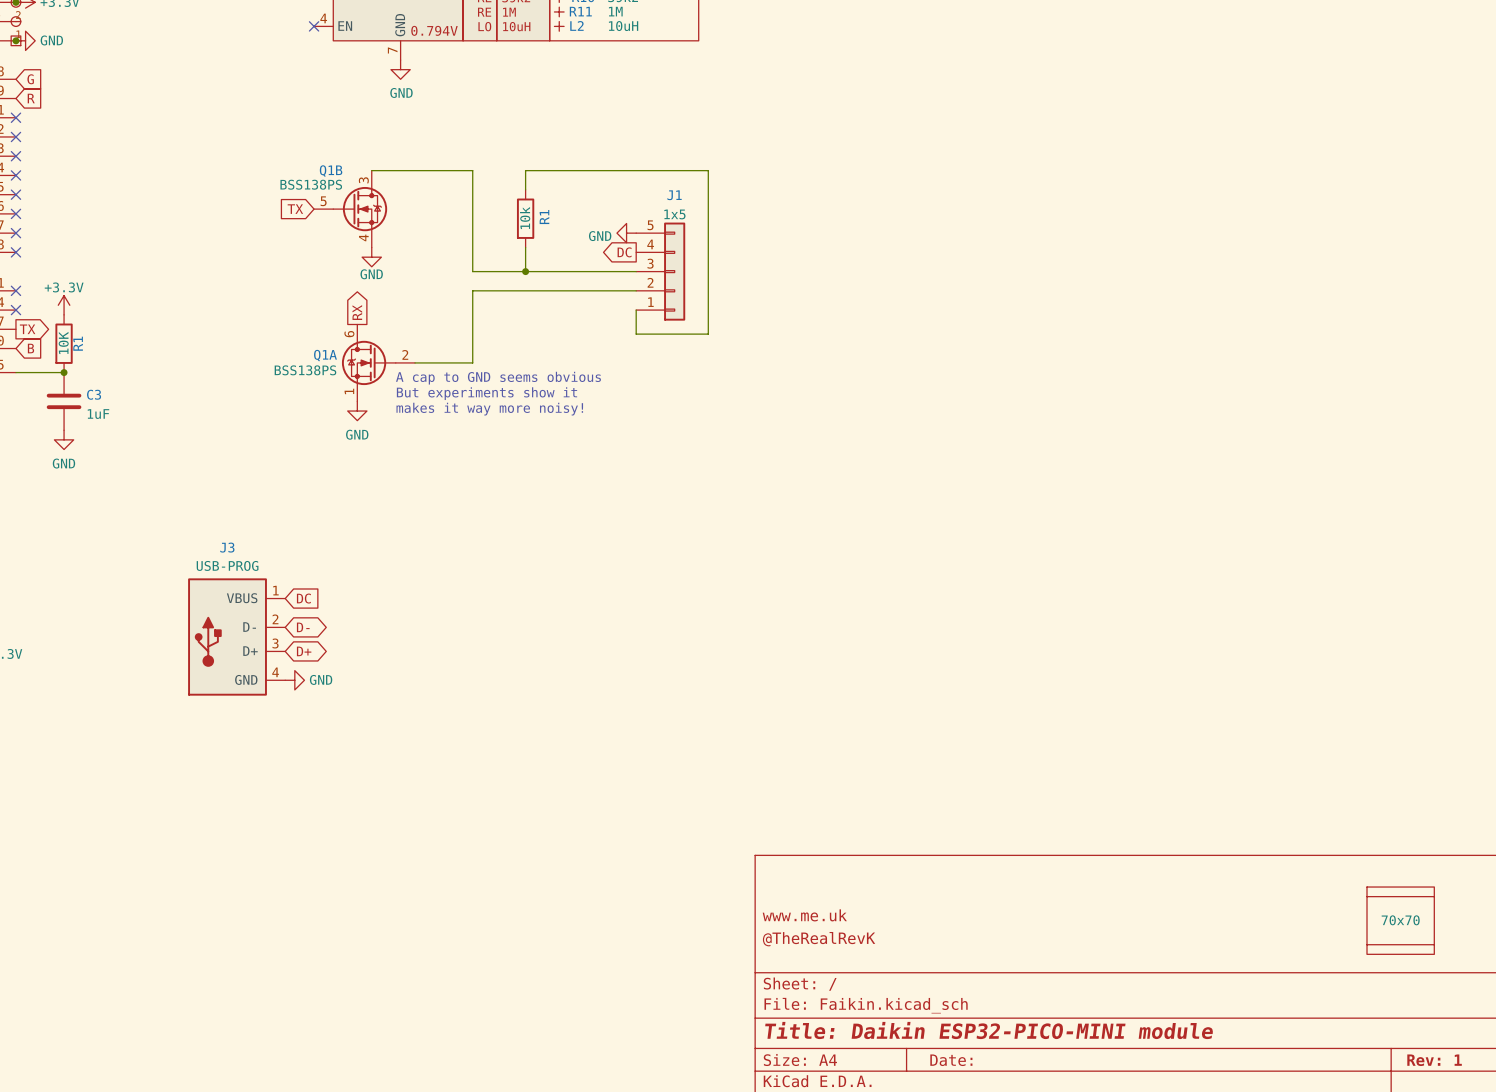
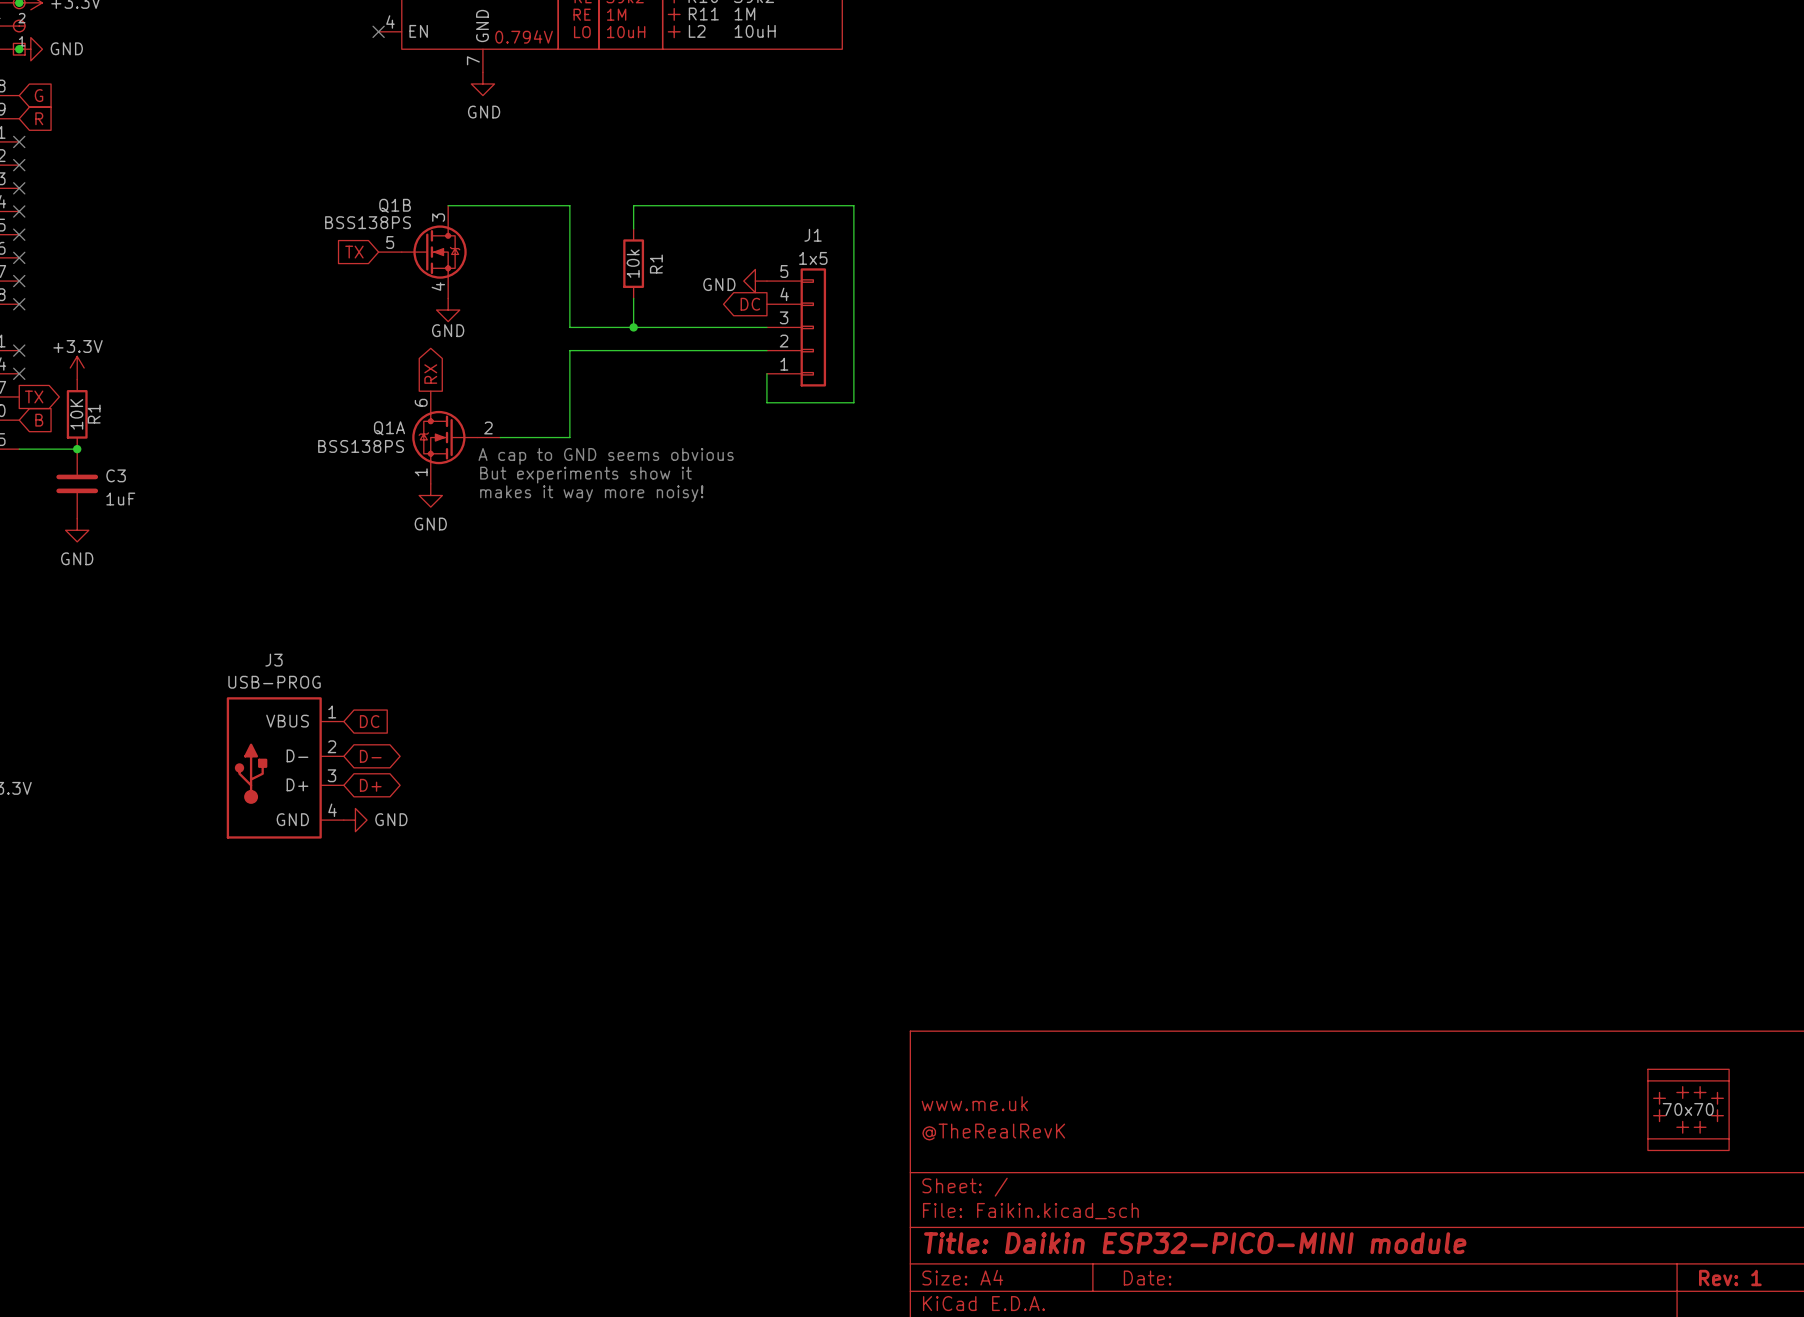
part: none -> (1682, 1092)
part: none -> (1700, 1092)
part: none -> (1659, 1098)
part: none -> (1717, 1098)
part: none -> (1659, 1115)
part: none -> (1717, 1115)
part: none -> (1682, 1127)
part: none -> (1700, 1127)

